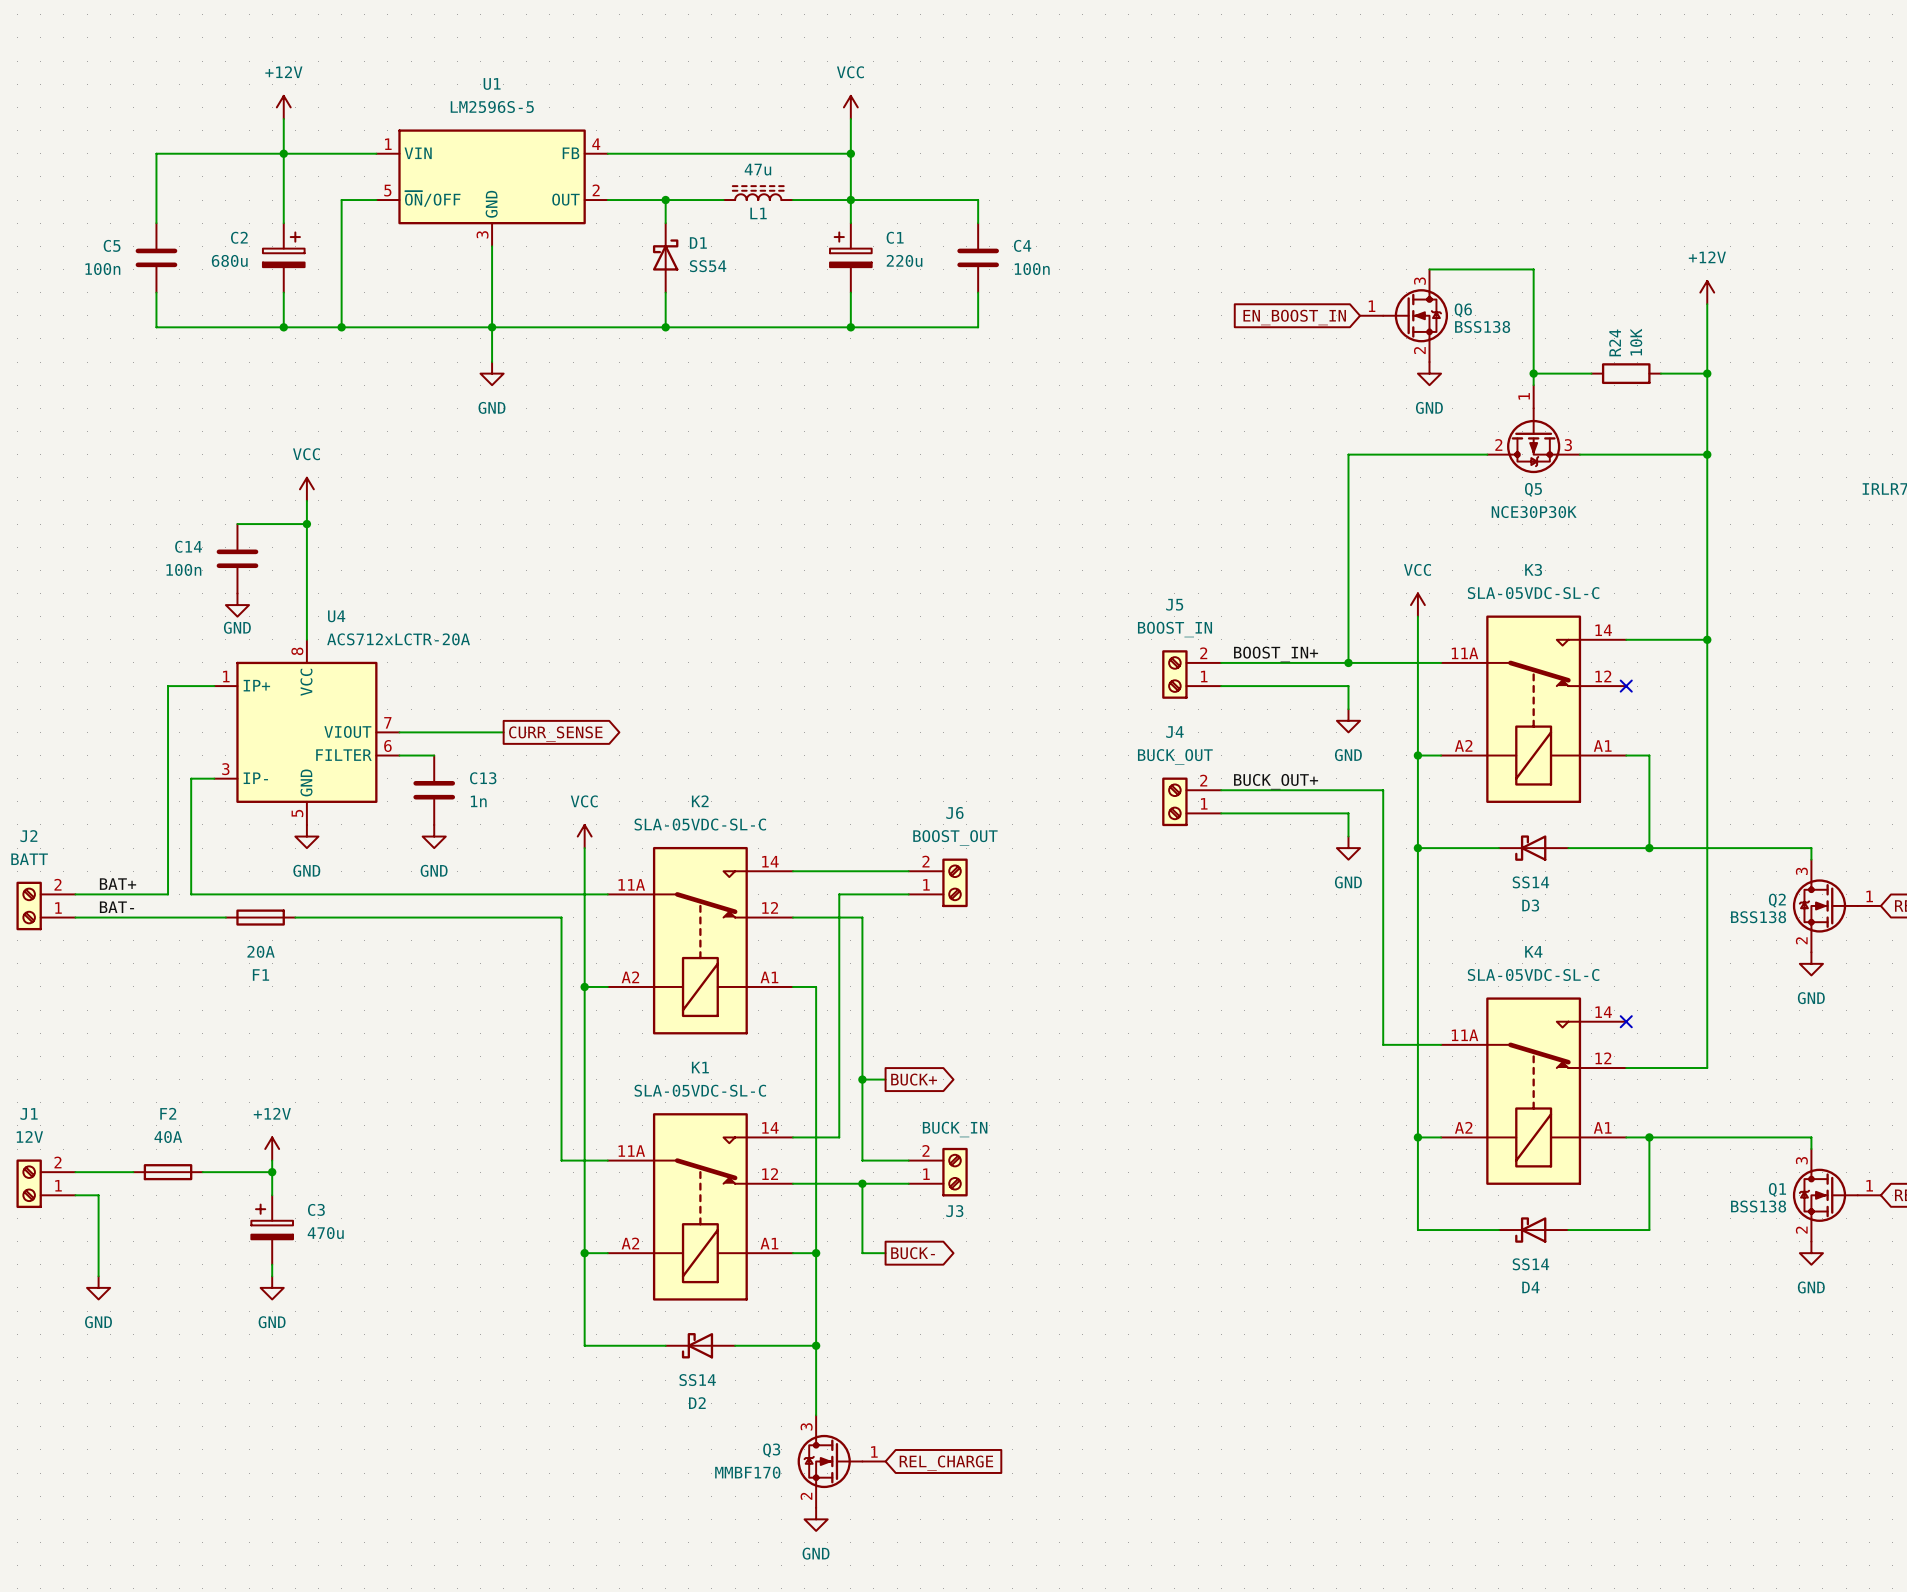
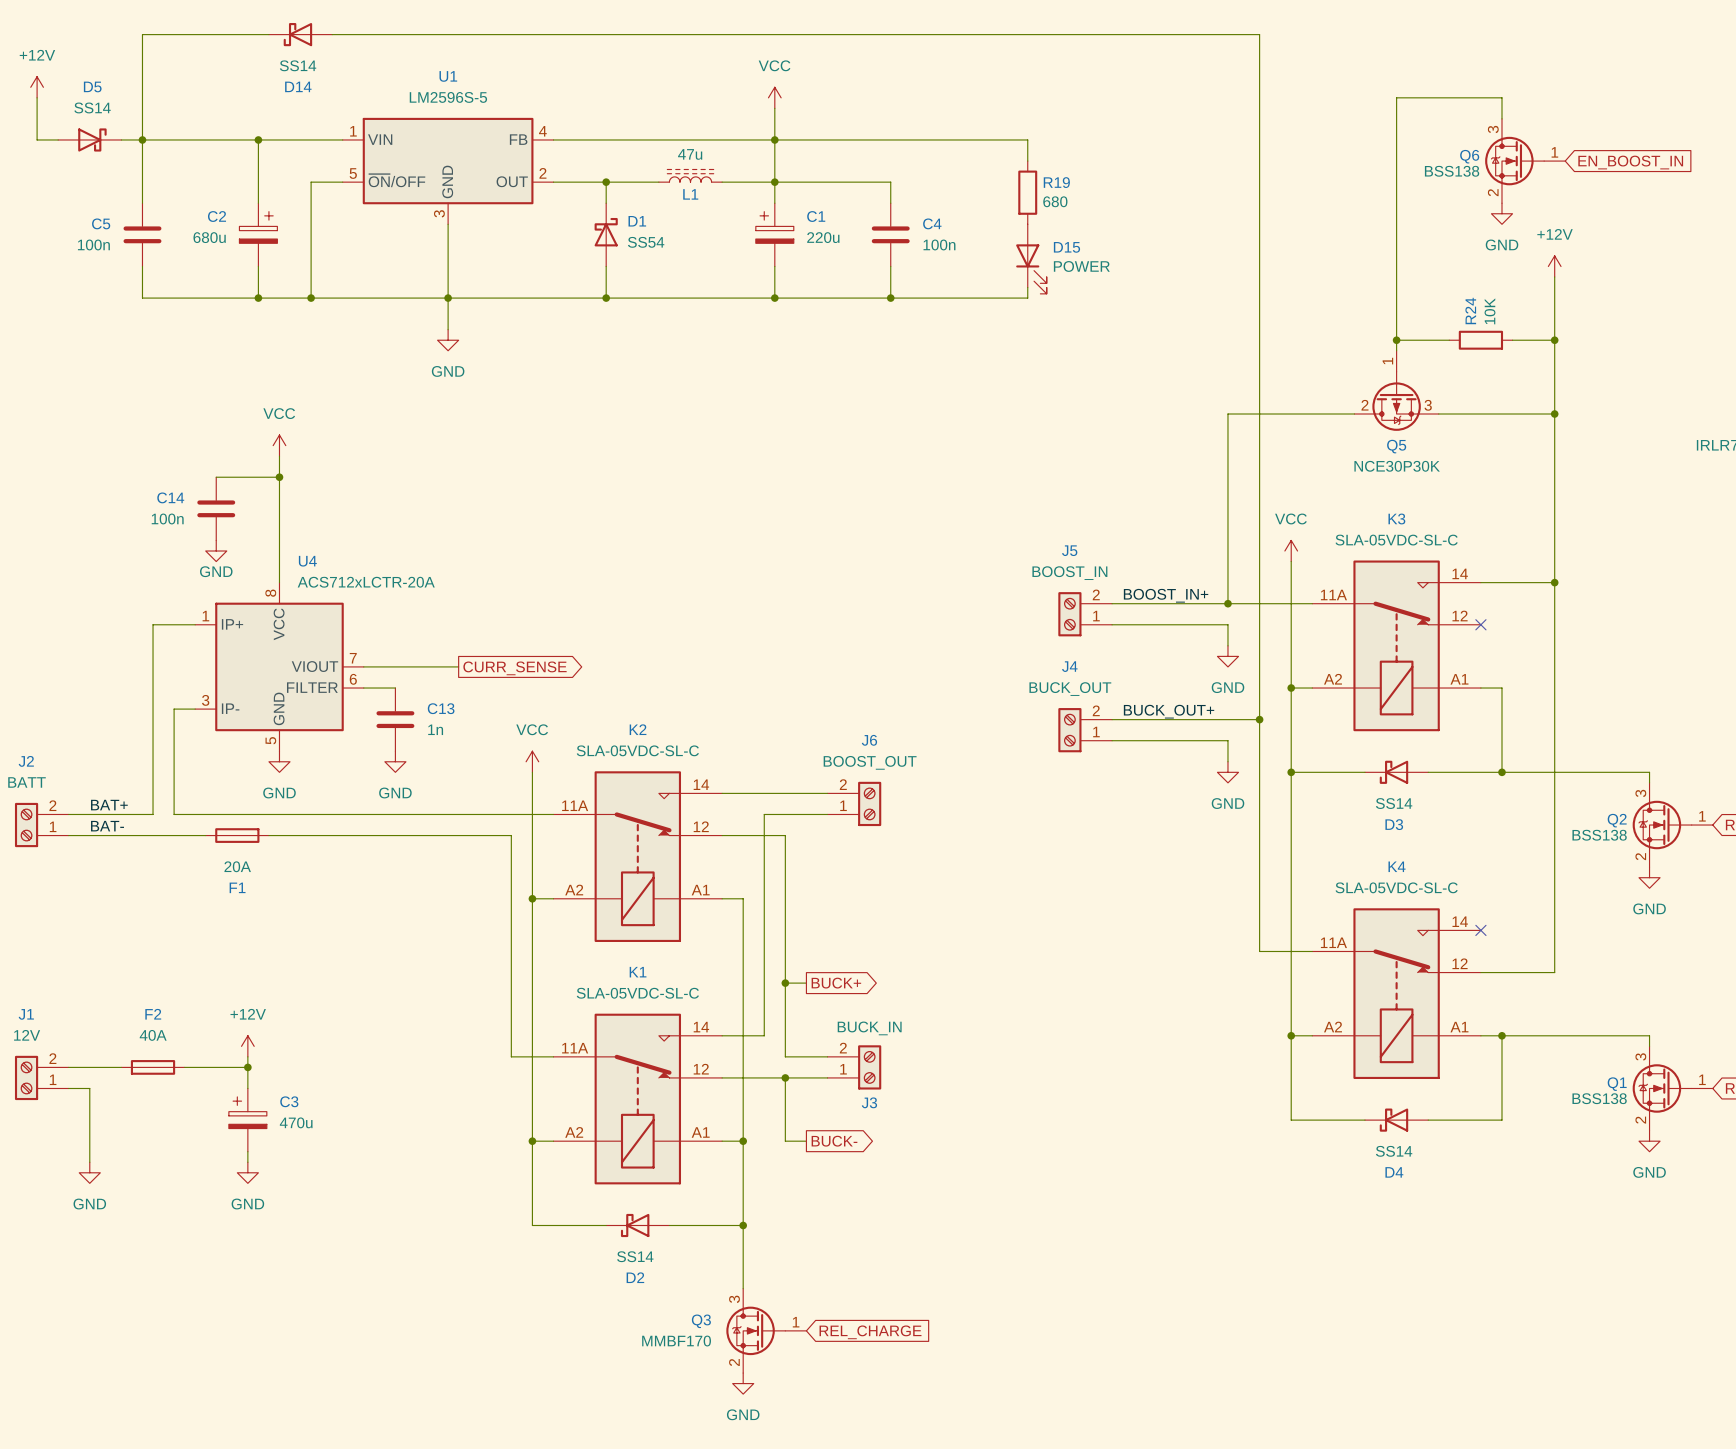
wire: none -> (268, 34) (142, 34) (142, 139) (121, 139)
D14: none -> SS14 (300, 34)
wire: none -> (332, 34) (1259, 34) (1259, 719)
power symbol: none -> +12V (37, 87)
wire: none -> (37, 97) (37, 139) (58, 139)
power symbol: +12V (283, 107) -> none
wire: (283, 119) (283, 153) -> none
D5: none -> SS14 (89, 139)
junction: none -> (142, 139)
wire: none -> (774, 139) (1027, 139) (1027, 161)
global label: none -> EN_BOOST_IN (1630, 162)
R19: none -> 680 (1027, 192)
power symbol: none -> GND (1501, 213)
wire: (1429, 269) (1533, 269) -> (1501, 118) (1501, 97) (1396, 97) (1396, 245)
D15: none -> POWER (1031, 259)
wire: none -> (1027, 287) (1027, 298) (890, 298)
Q6 position: (1404, 315) -> (1525, 161)
Q6 flip: as is (1415, 315) -> left-right (1514, 161)
global label: EN_BOOST_IN (1294, 317) -> none
junction: none -> (890, 298)
power symbol: GND (1429, 373) -> none
junction: none -> (1259, 719)

